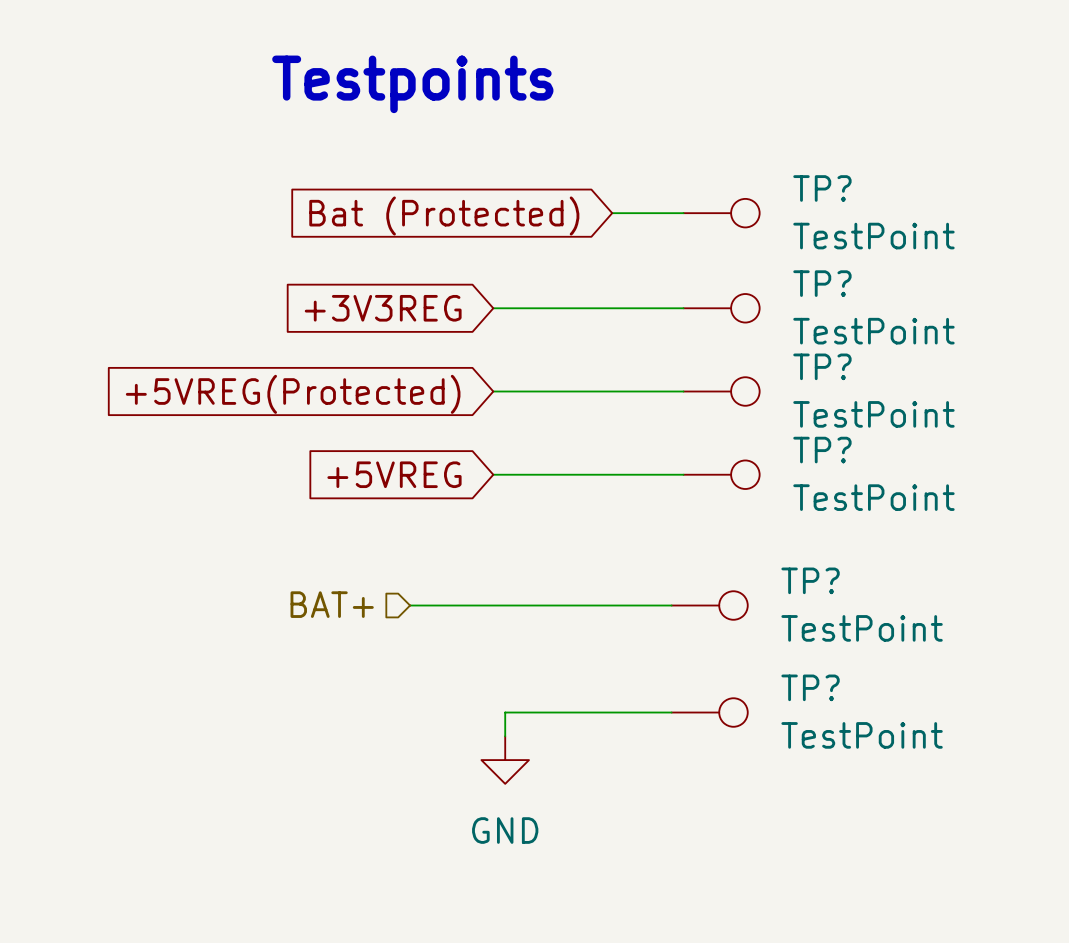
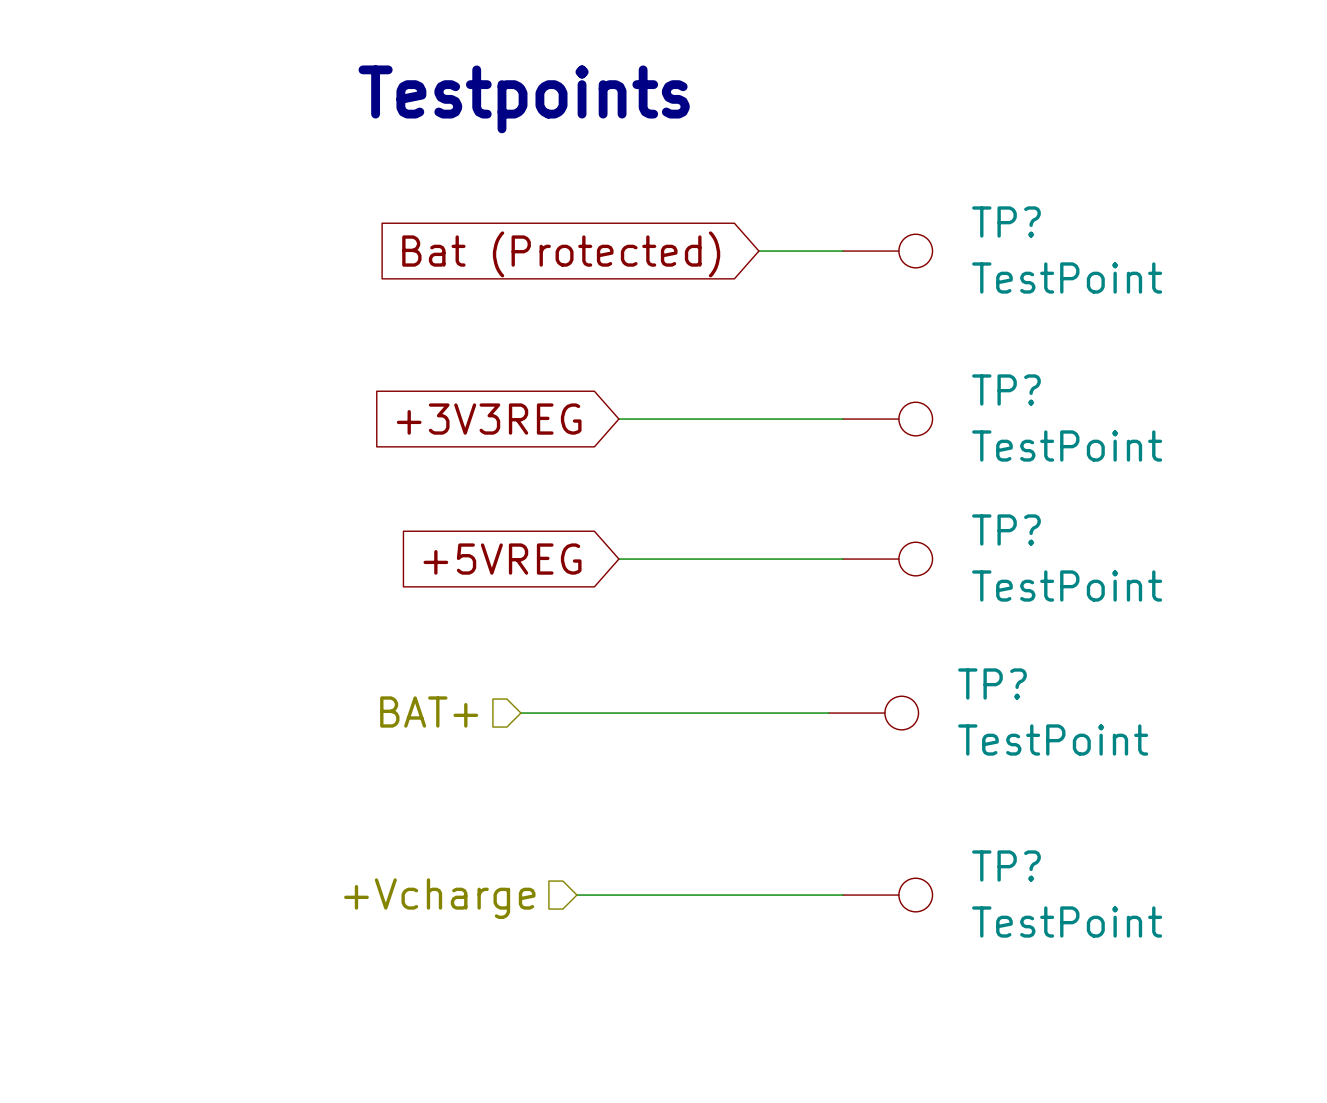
global label position: +3V3REG (383, 308) -> +3V3REG (489, 419)
wire: (493, 308) (683, 308) -> none
TP?: TestPoint (721, 308) -> none
TP?: none -> TestPoint (887, 419)
wire: (493, 391) (683, 391) -> (618, 419) (842, 419)
TP?: TestPoint (721, 391) -> none
global label: +5VREG(Protected) (293, 394) -> none
wire: (671, 712) (505, 712) (505, 736) -> none
TP? position: (709, 712) -> (887, 895)
wire: none -> (576, 895) (842, 895)
power symbol: GND (505, 760) -> none
hierarchical label: none -> +Vcharge (439, 898)

